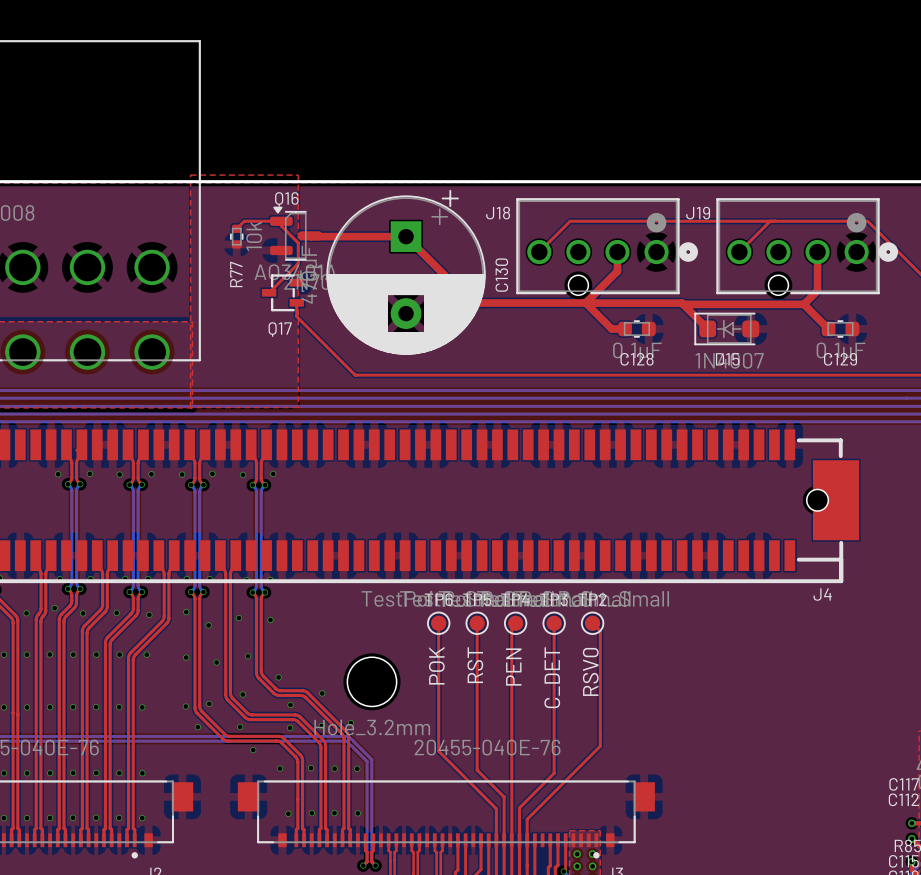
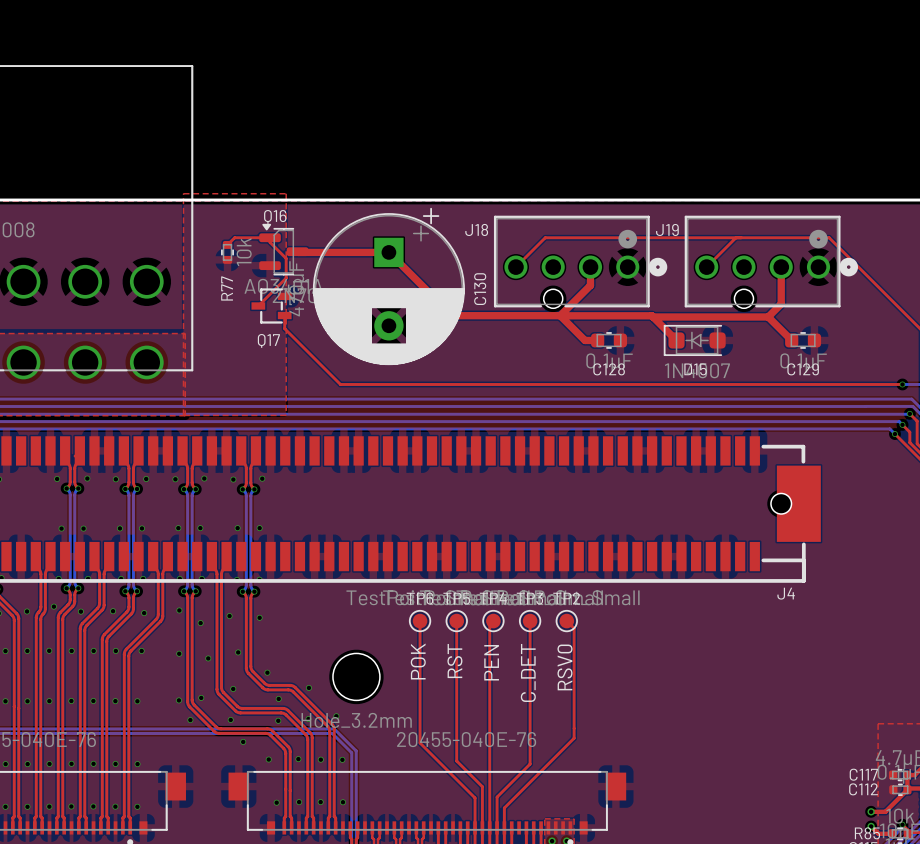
via: none -> (178, 528)
via: none -> (200, 528)
via: none -> (237, 528)
via: none -> (259, 528)
via: none -> (61, 528)
via: none -> (83, 528)
via: none -> (119, 528)
via: none -> (141, 528)

